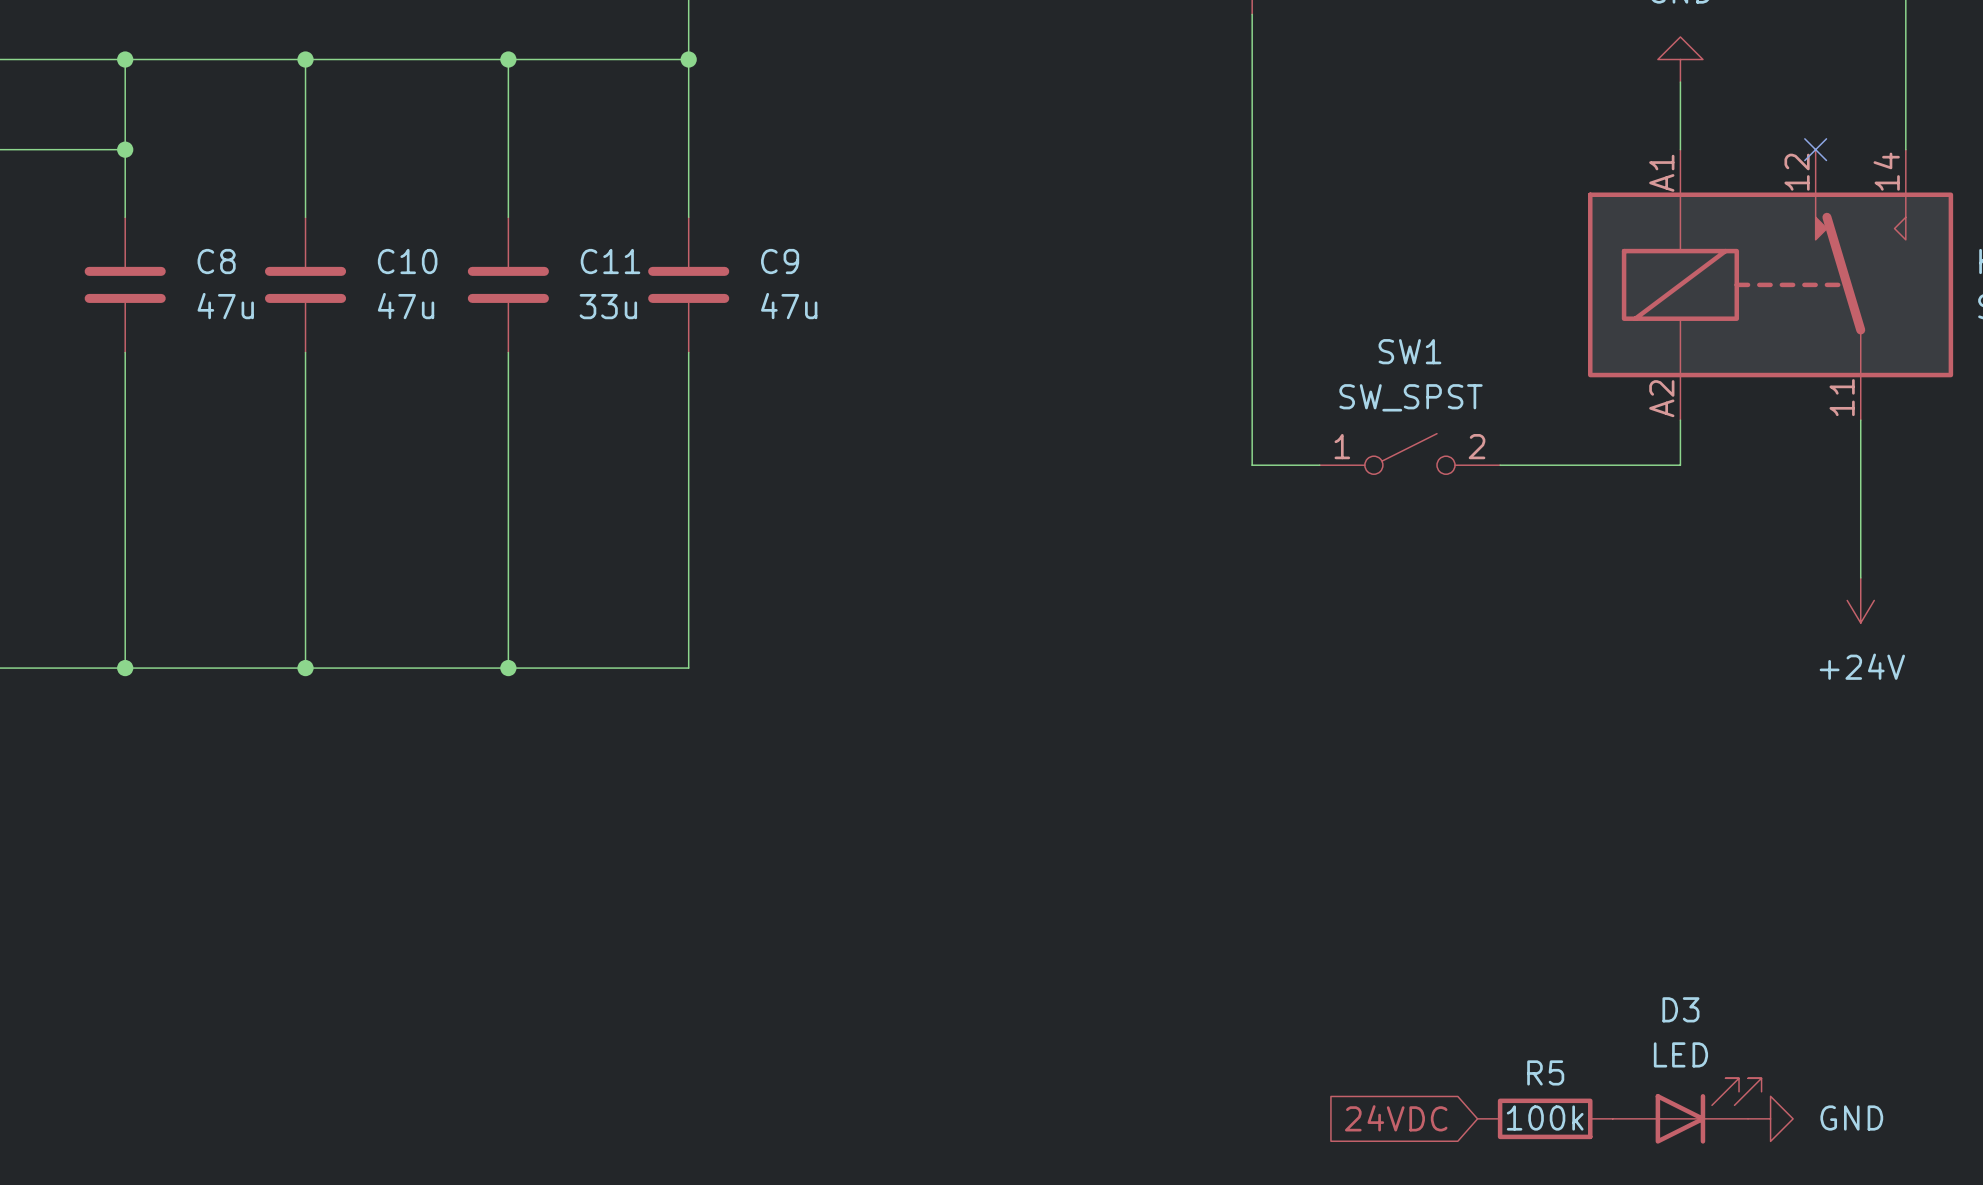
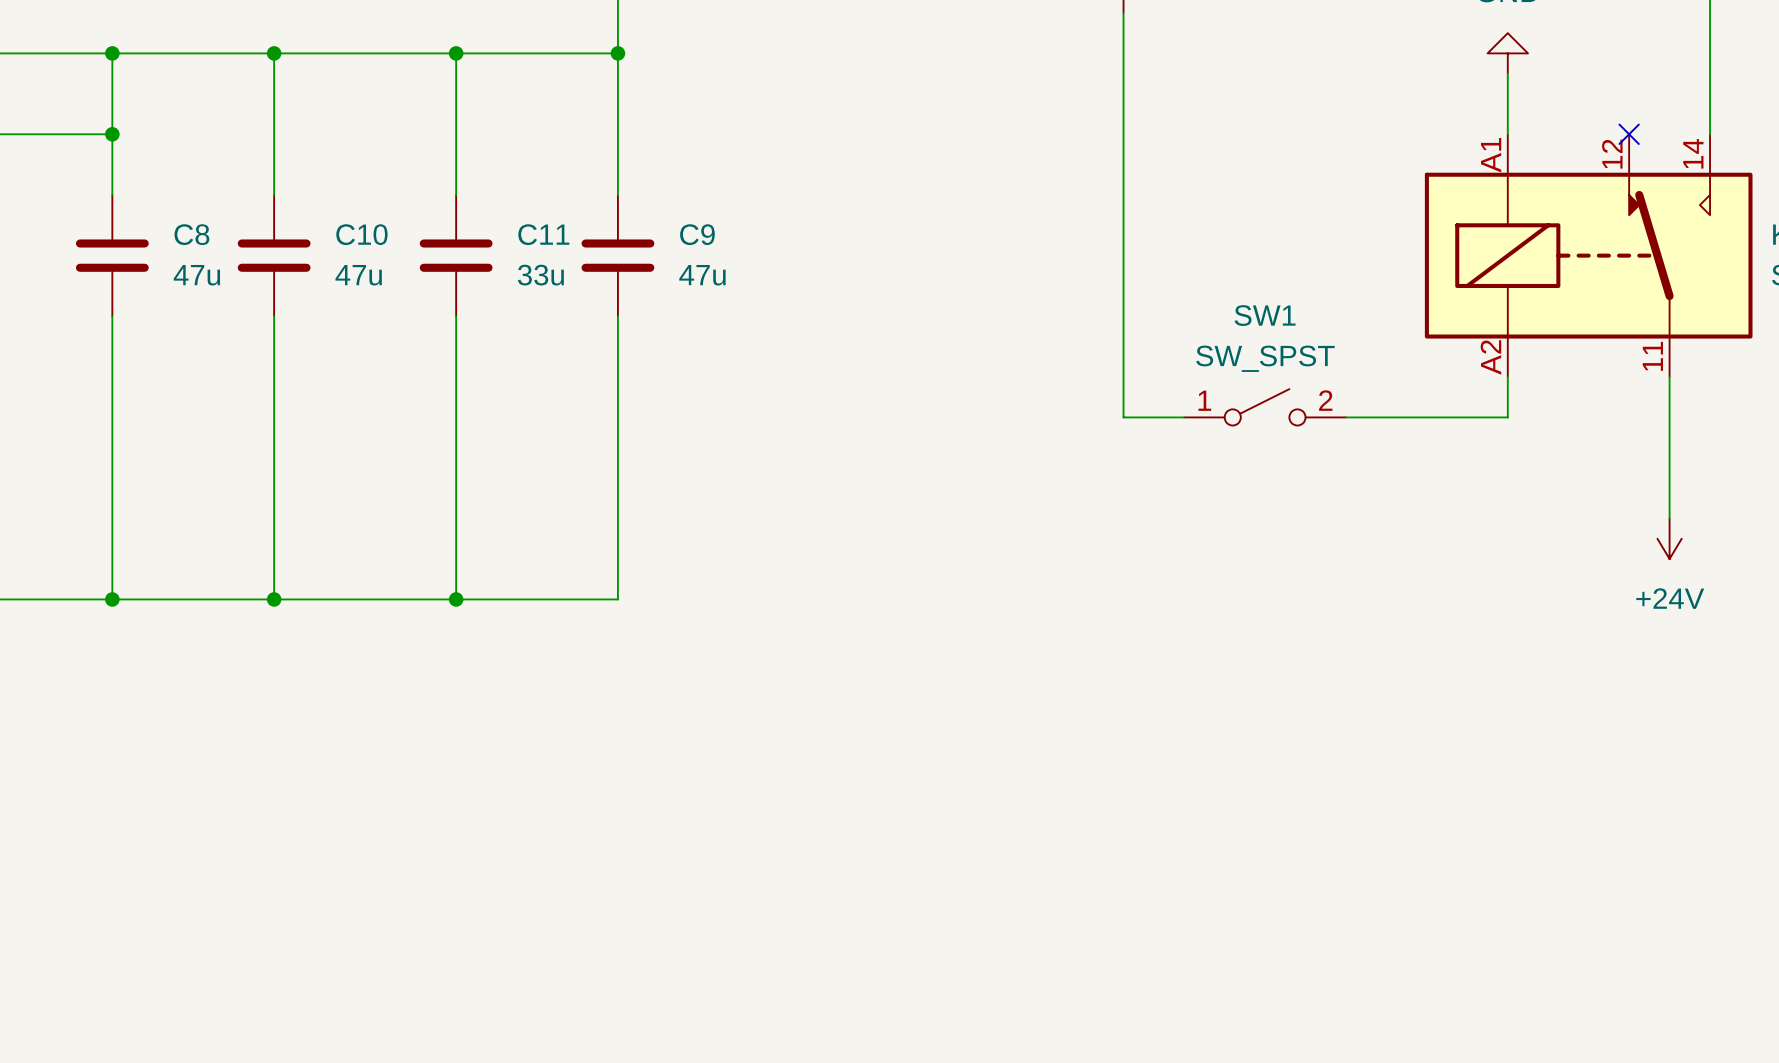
D3: LED (1687, 1110) -> none
global label: 24VDC (1396, 1118) -> none
R5: 100k (1545, 1118) -> none
power symbol: GND (1770, 1118) -> none

